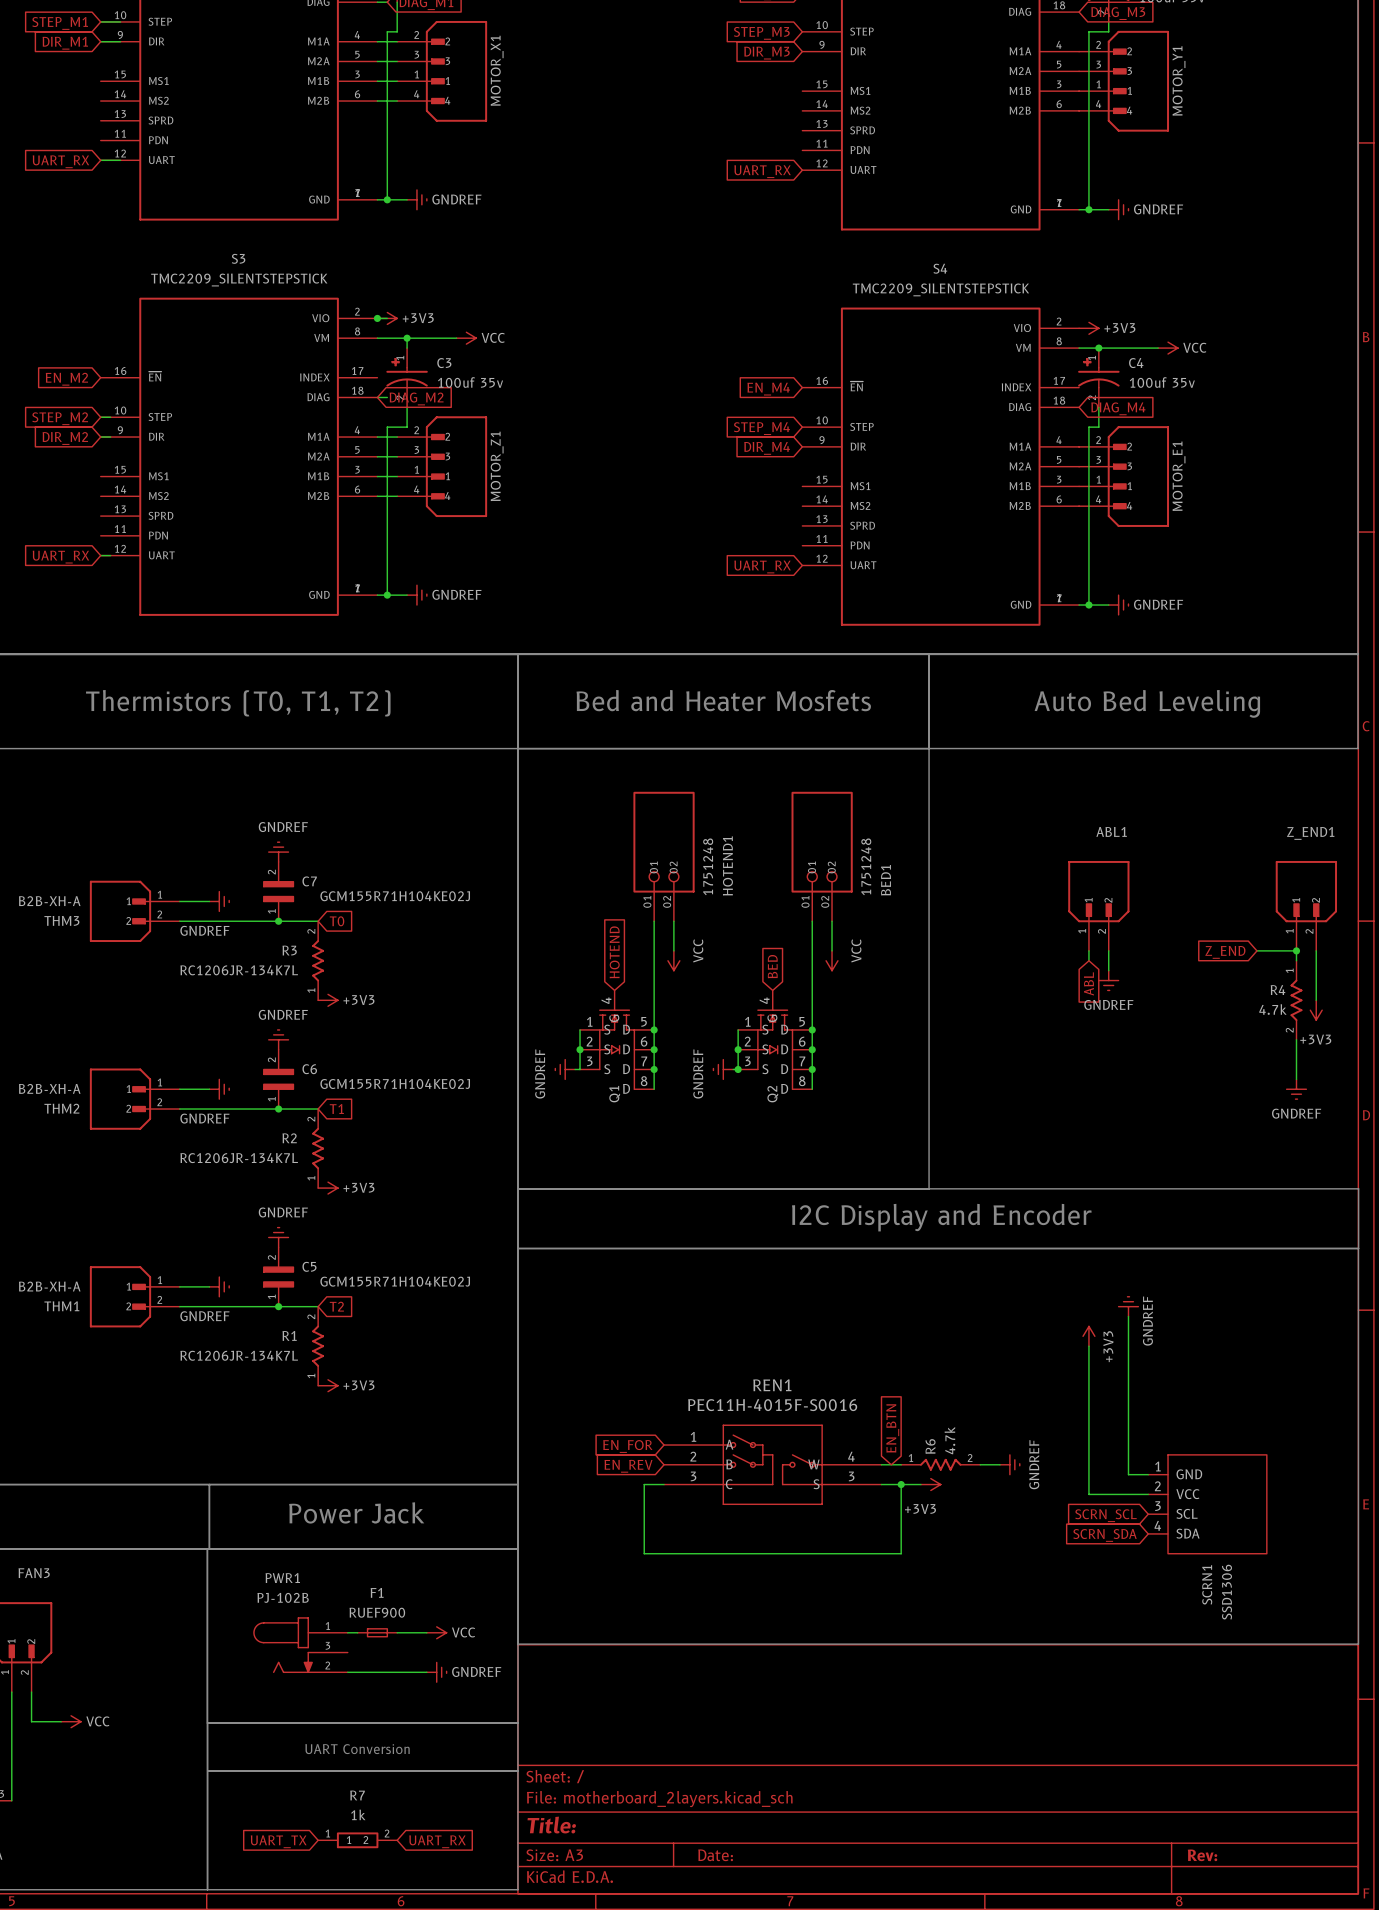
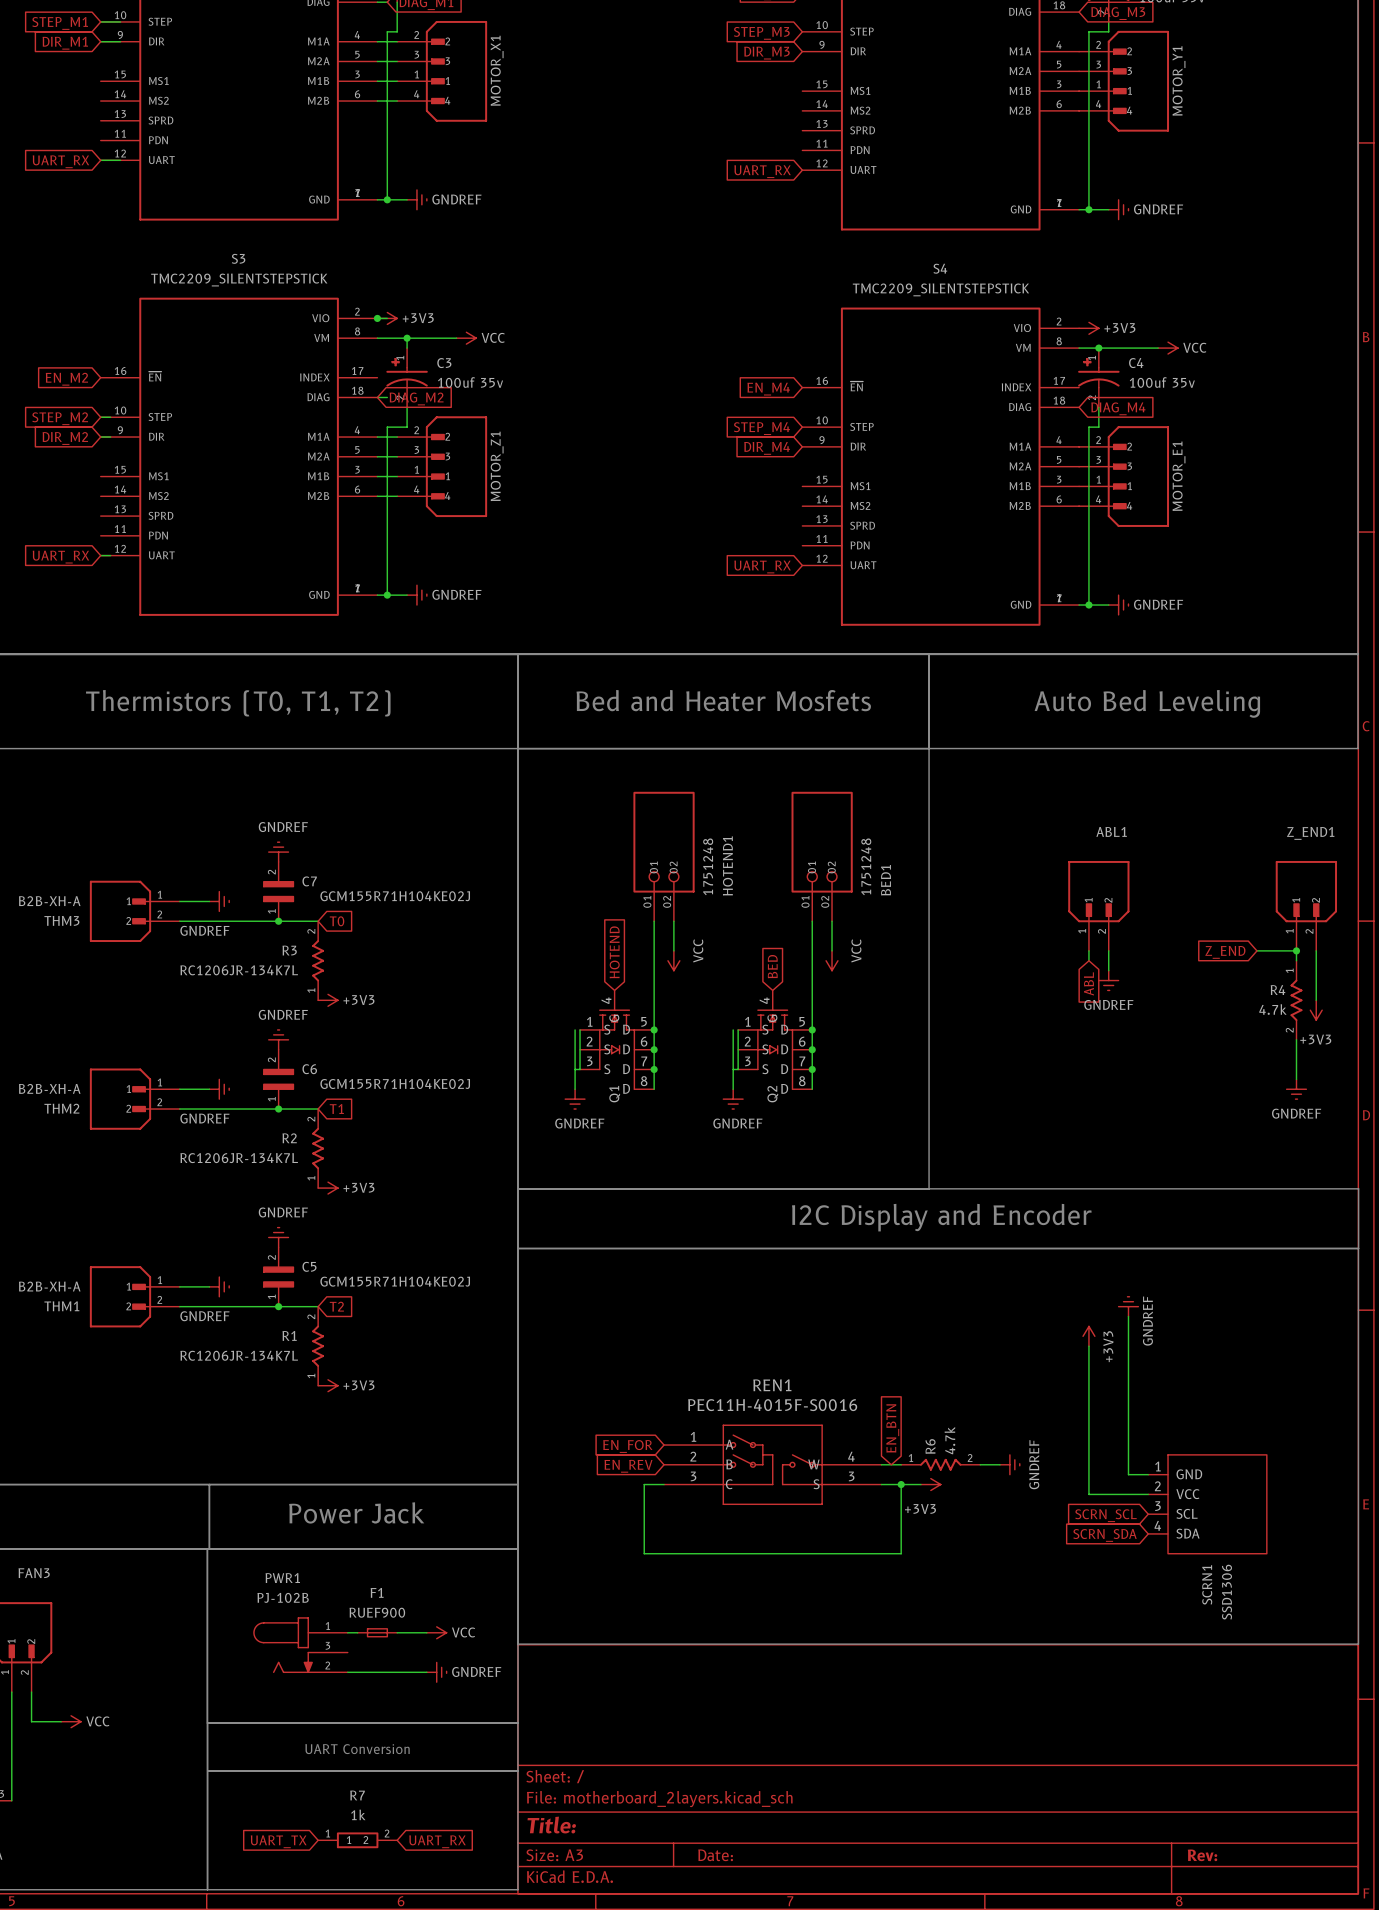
wire: none -> (575, 1029) (575, 1089)
wire: none -> (733, 1029) (733, 1089)
junction: (580, 1049) -> none
junction: (738, 1049) -> none
power symbol rotation: 0° (565, 1069) -> 90° counterclockwise (575, 1099)
power symbol position: GNDREF (565, 1069) -> GNDREF (575, 1099)
power symbol rotation: 0° (723, 1069) -> 90° counterclockwise (733, 1099)
power symbol position: GNDREF (723, 1069) -> GNDREF (733, 1099)
junction: (738, 1069) -> none

